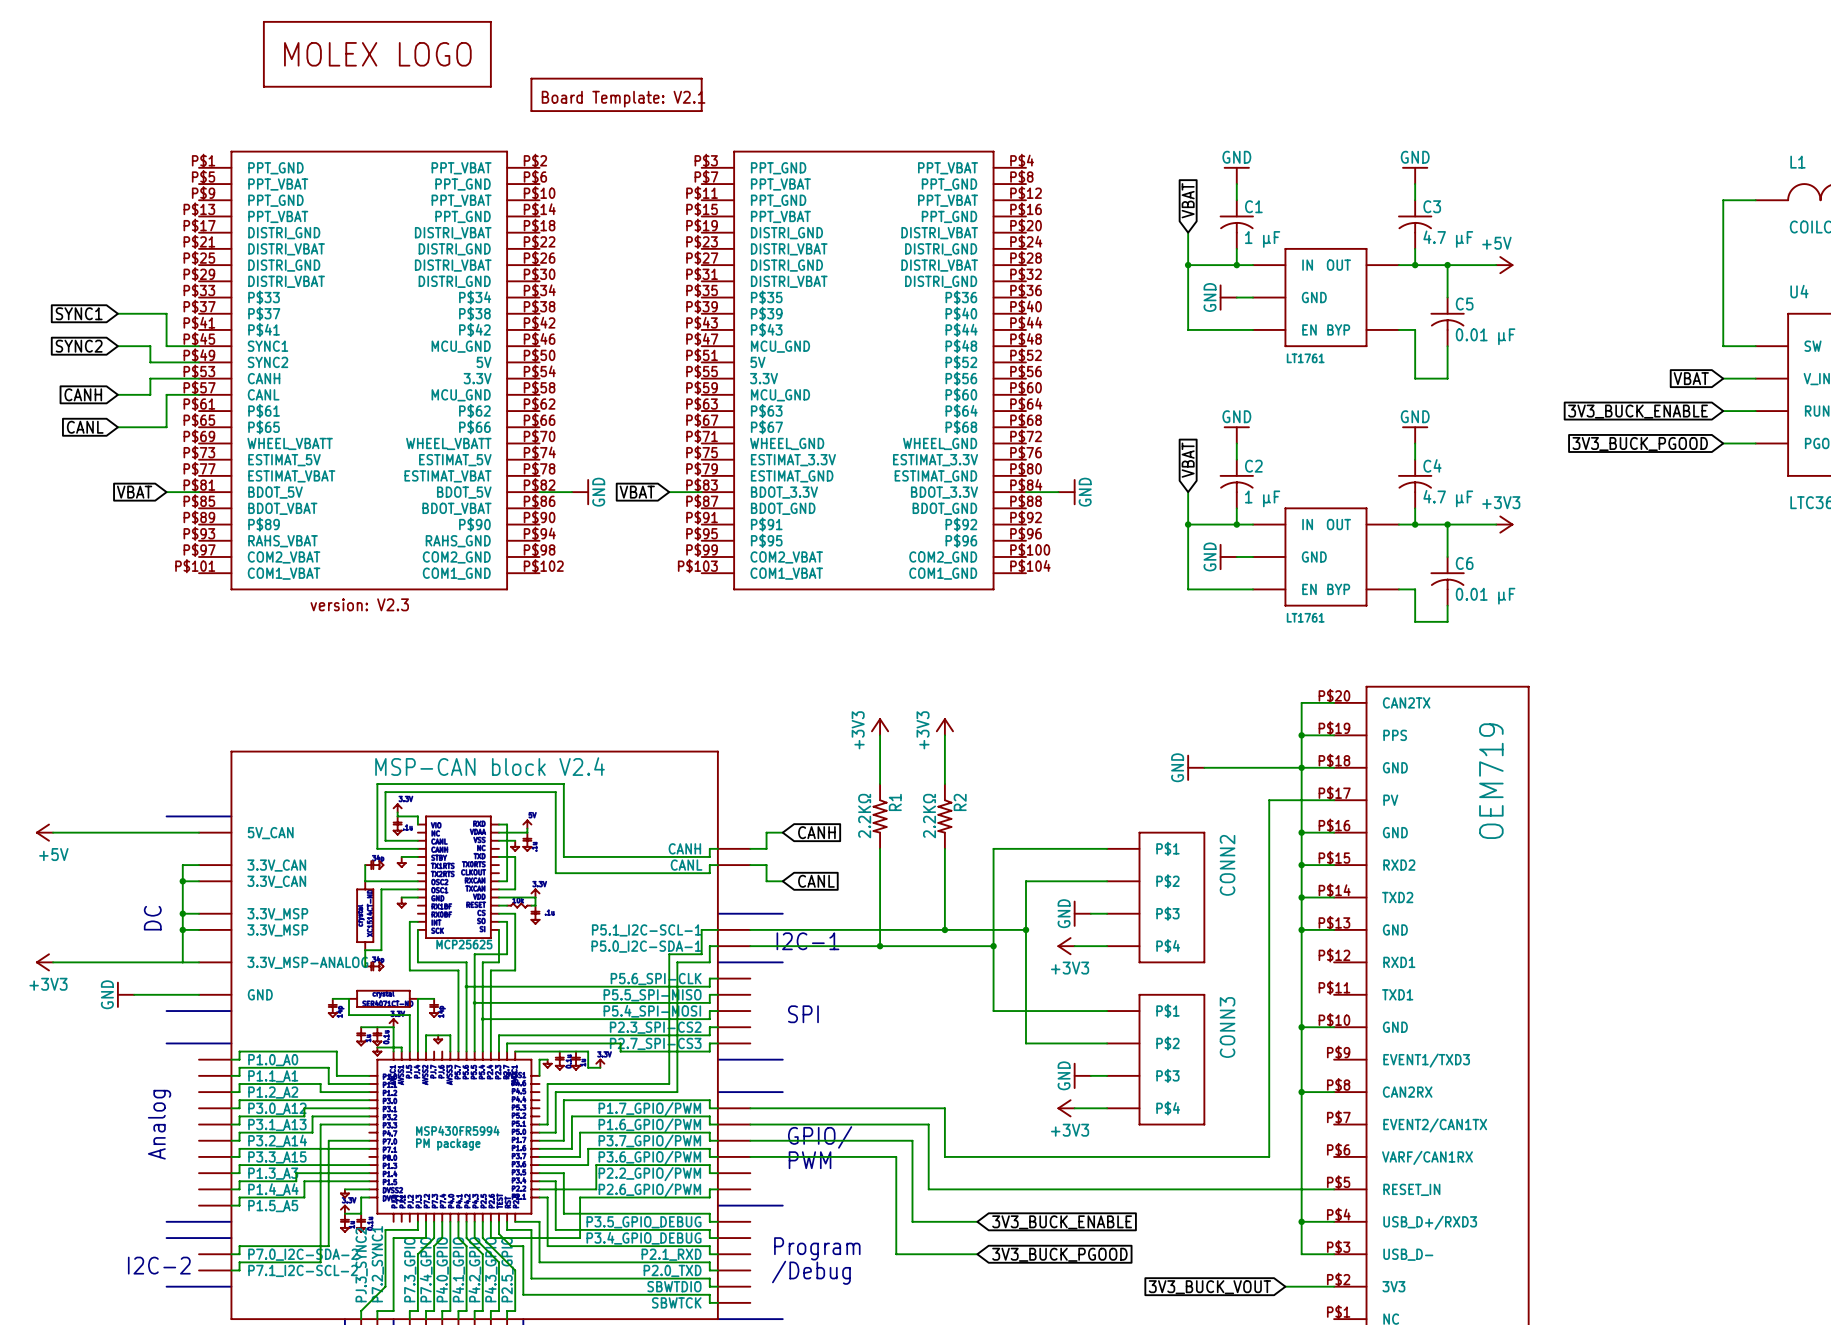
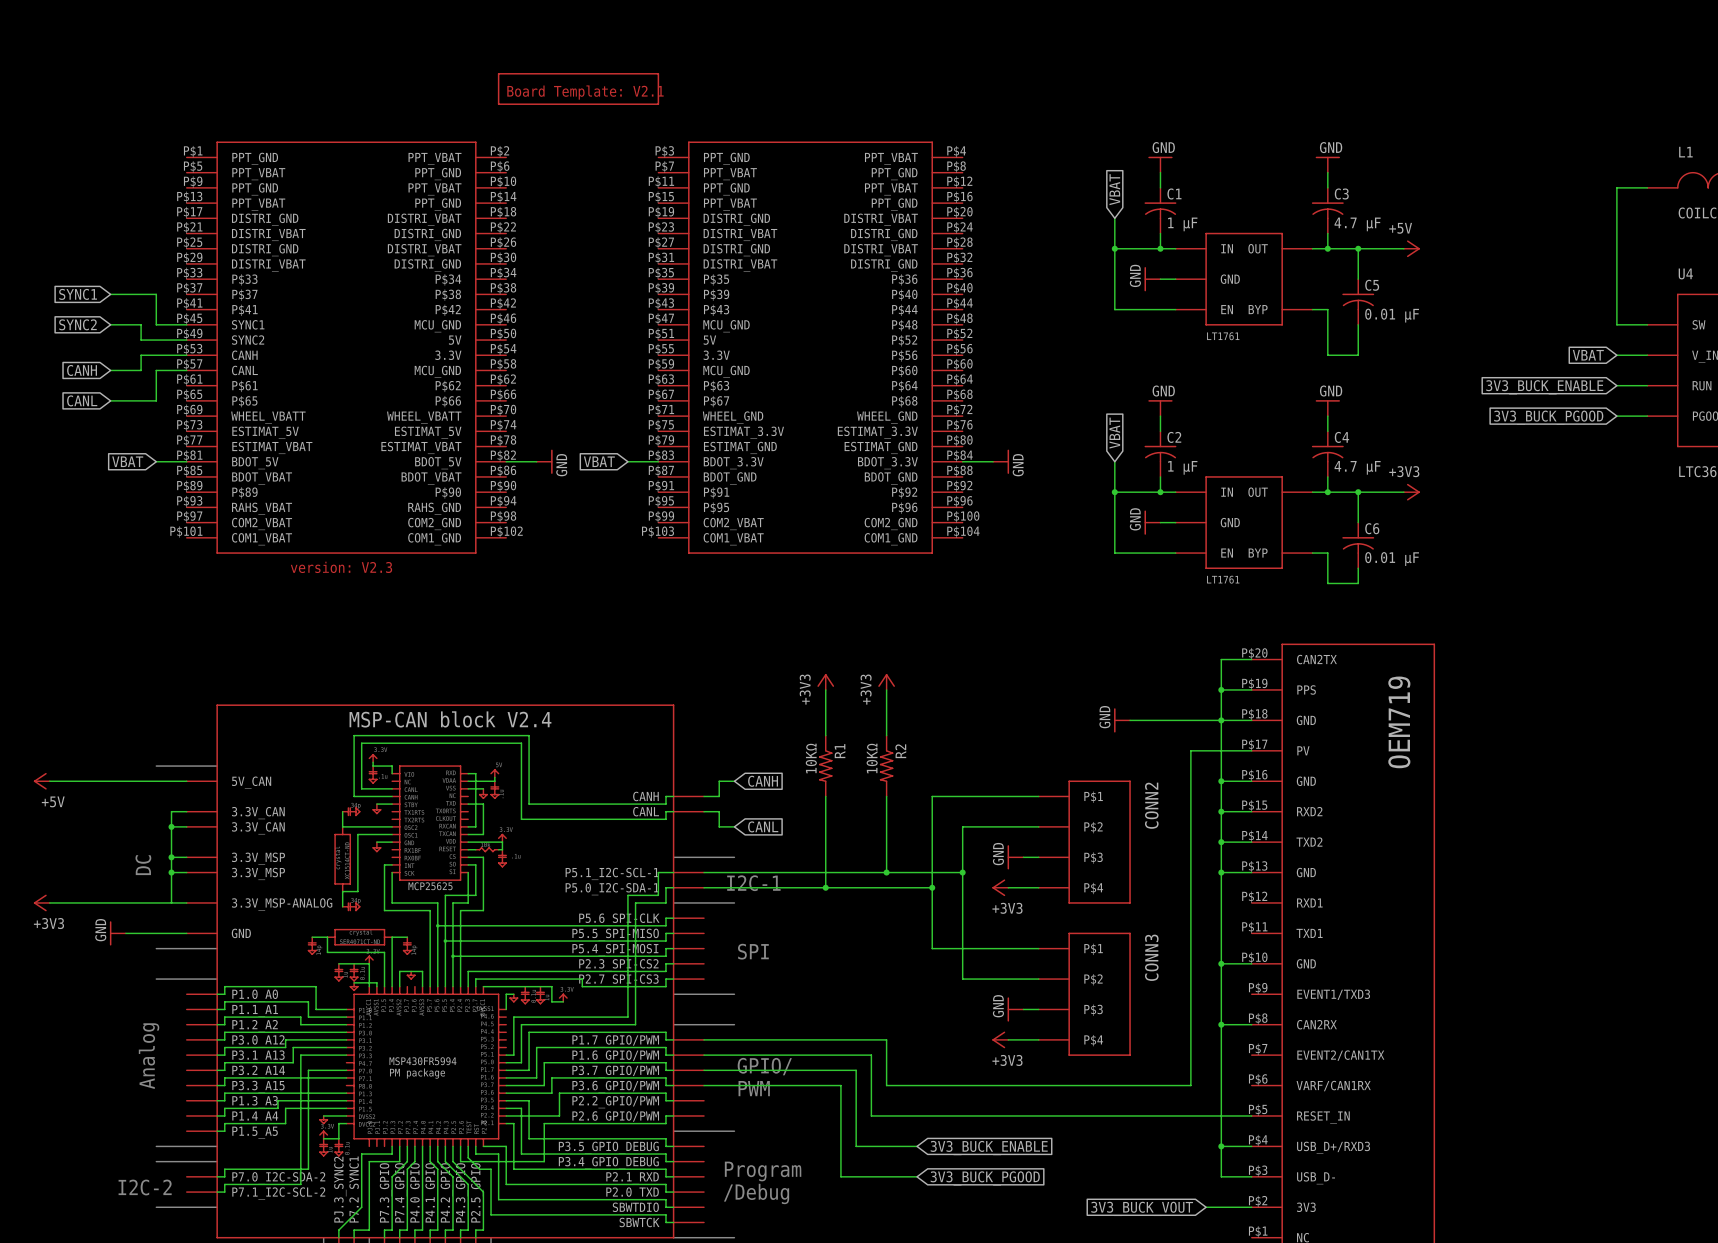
part: (377, 54) -> none
R1 value: 2.2KΩ (864, 816) -> 10KΩ (811, 758)
R2 value: 2.2KΩ (929, 816) -> 10KΩ (872, 758)

